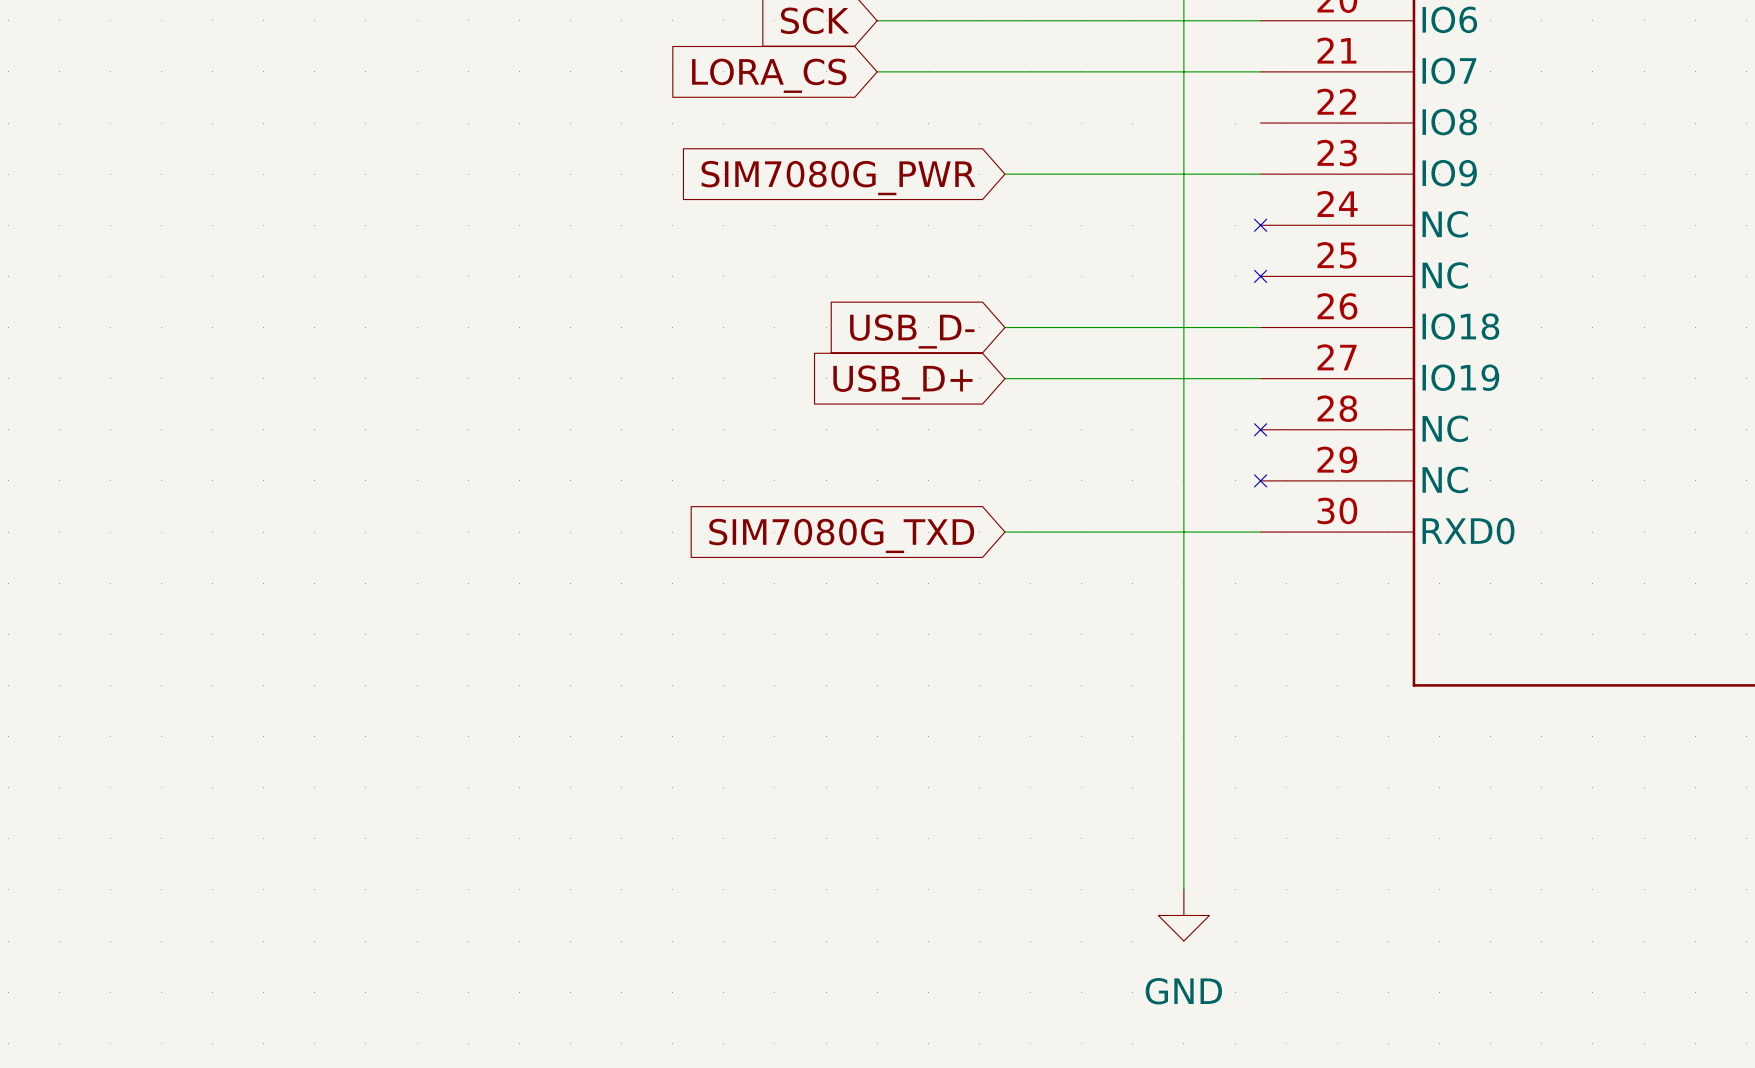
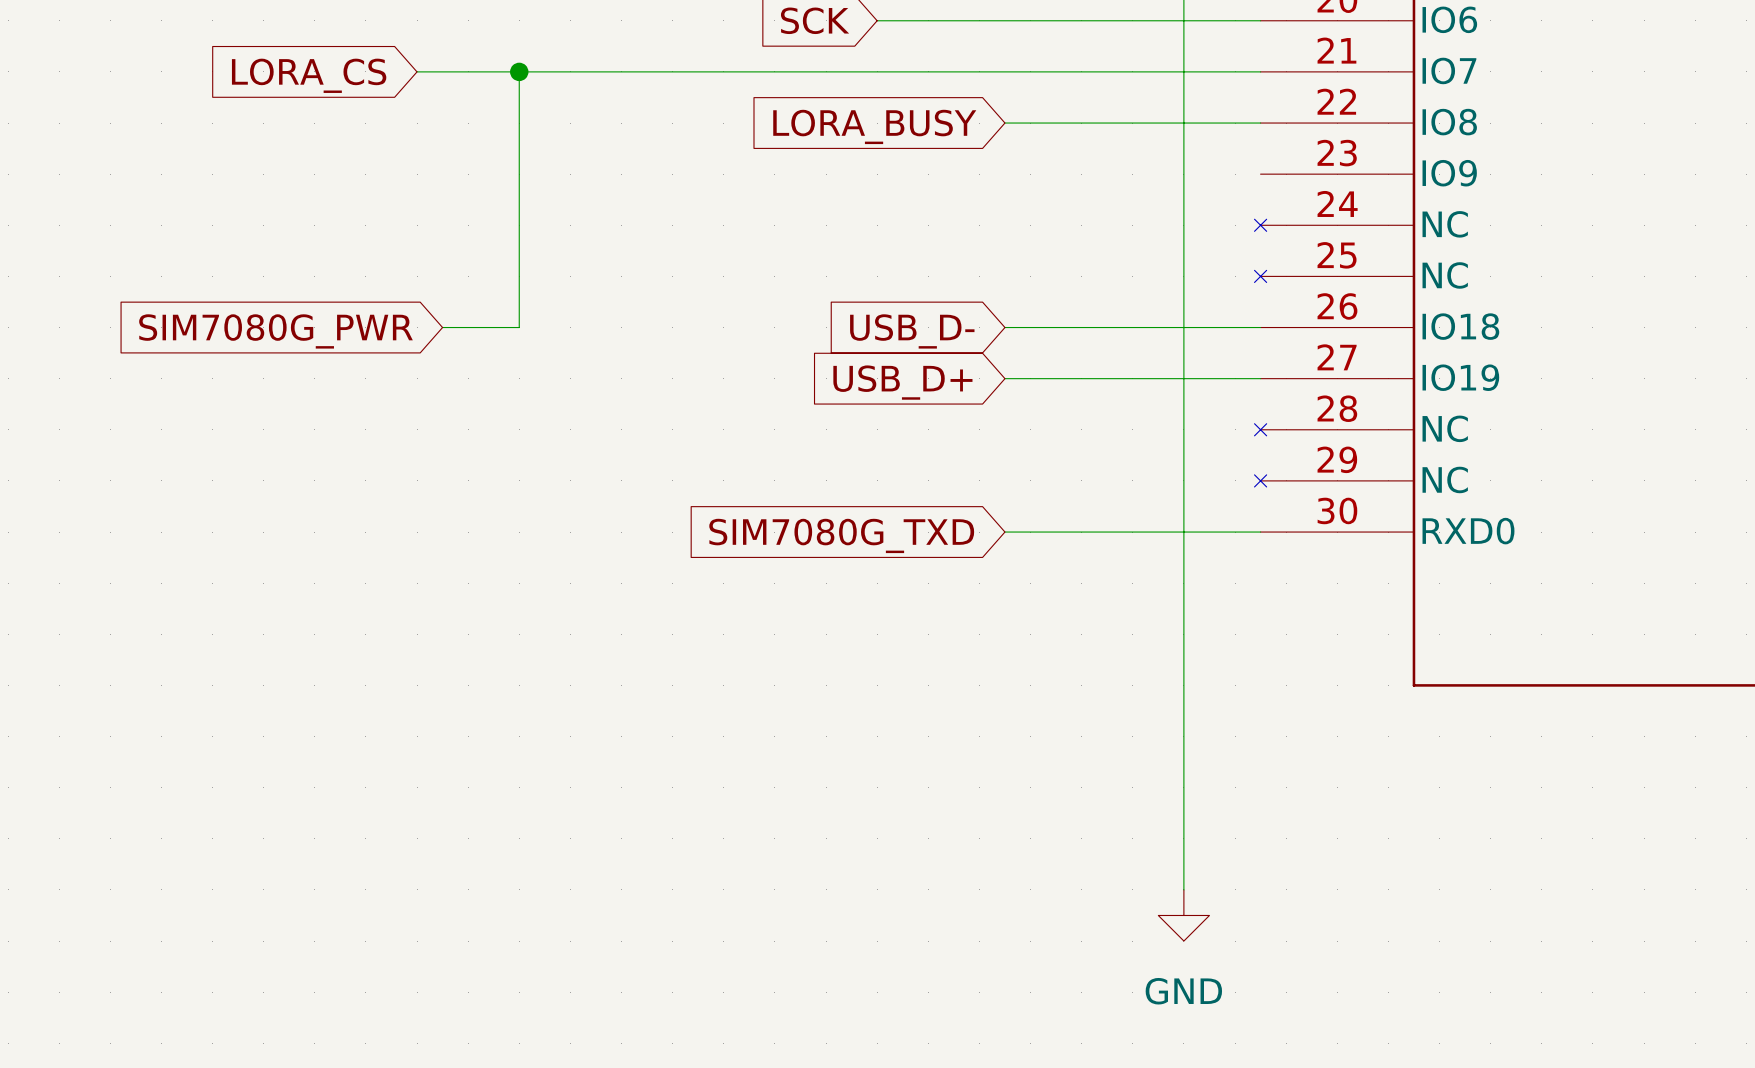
wire: none -> (417, 71) (877, 71)
wire: none -> (519, 71) (519, 327) (442, 327)
junction: none -> (519, 71)
global label position: LORA_CS (769, 75) -> LORA_CS (309, 75)
global label: none -> LORA_BUSY (874, 126)
wire: (1004, 174) (1260, 174) -> (1004, 123) (1260, 123)
global label: SIM7080G_PWR (838, 178) -> none
global label: none -> SIM7080G_PWR (275, 331)

